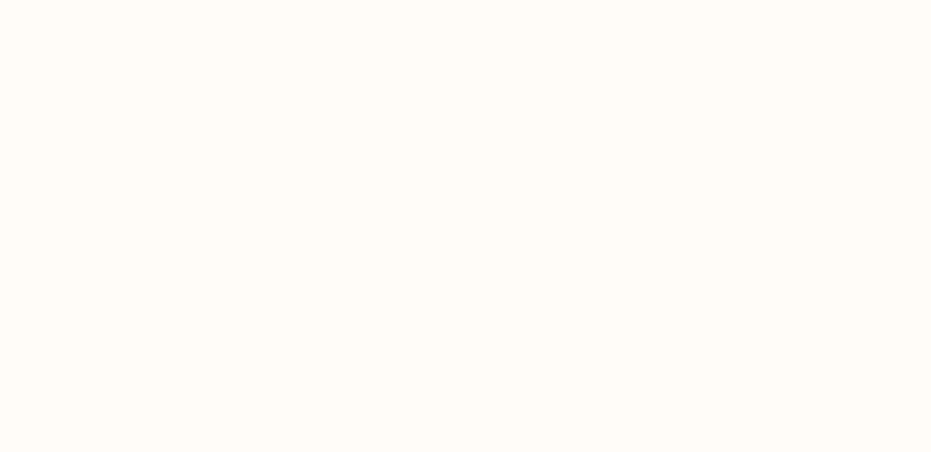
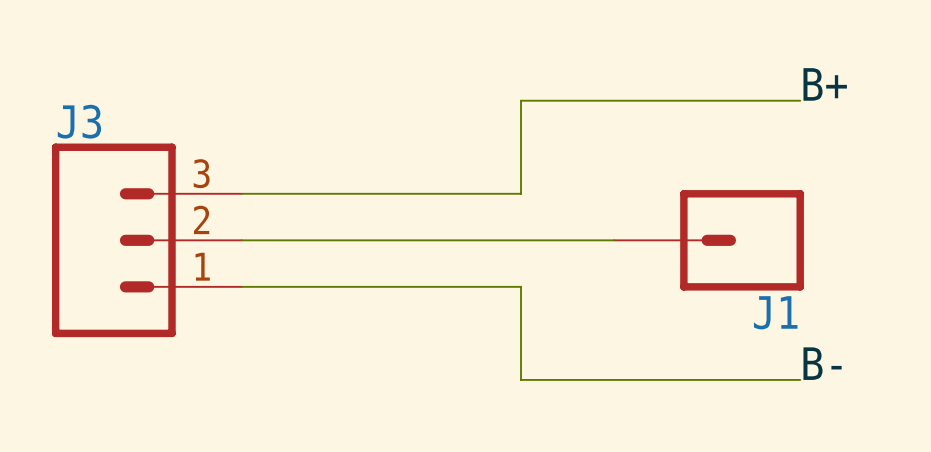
label: none -> B+ (825, 84)
wire: none -> (800, 100) (521, 100) (521, 193) (241, 193)
J3: none -> (146, 240)
wire: none -> (241, 240) (614, 240)
J1: none -> (709, 240)
wire: none -> (241, 286) (521, 286) (521, 379) (800, 379)
label: none -> B- (822, 363)

